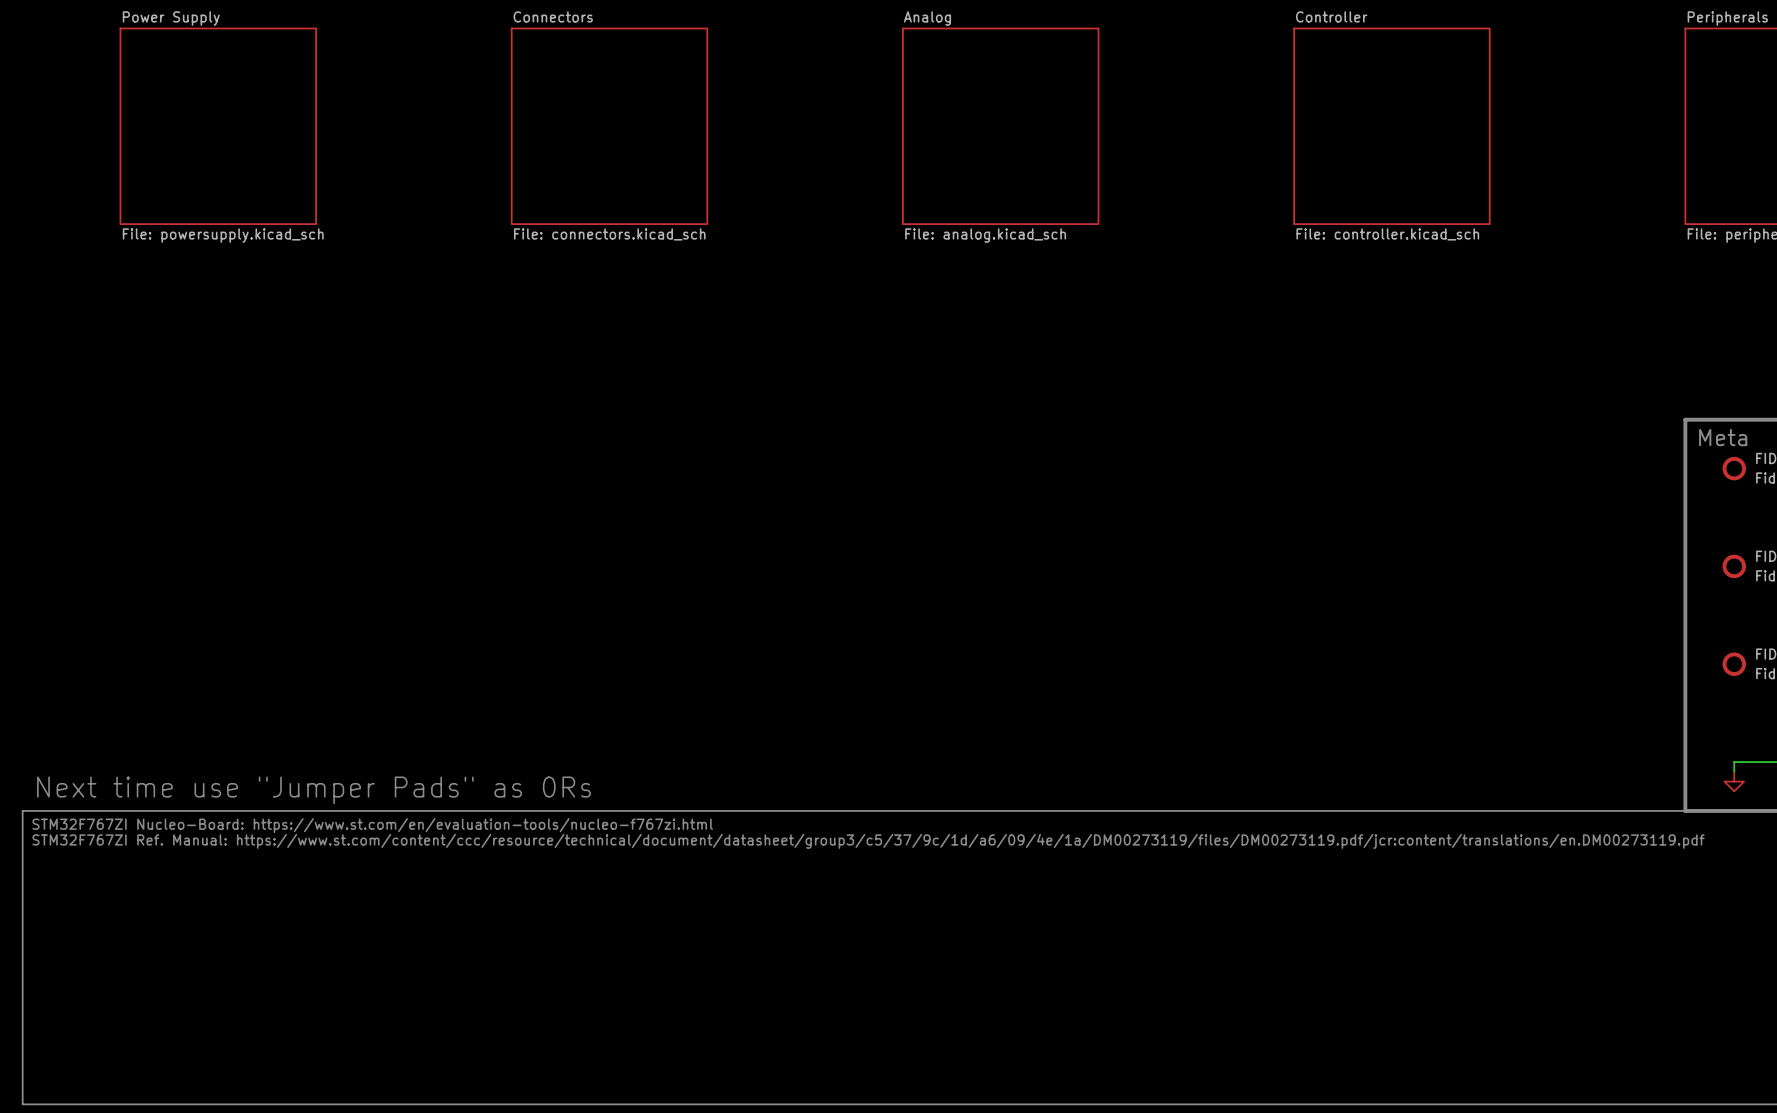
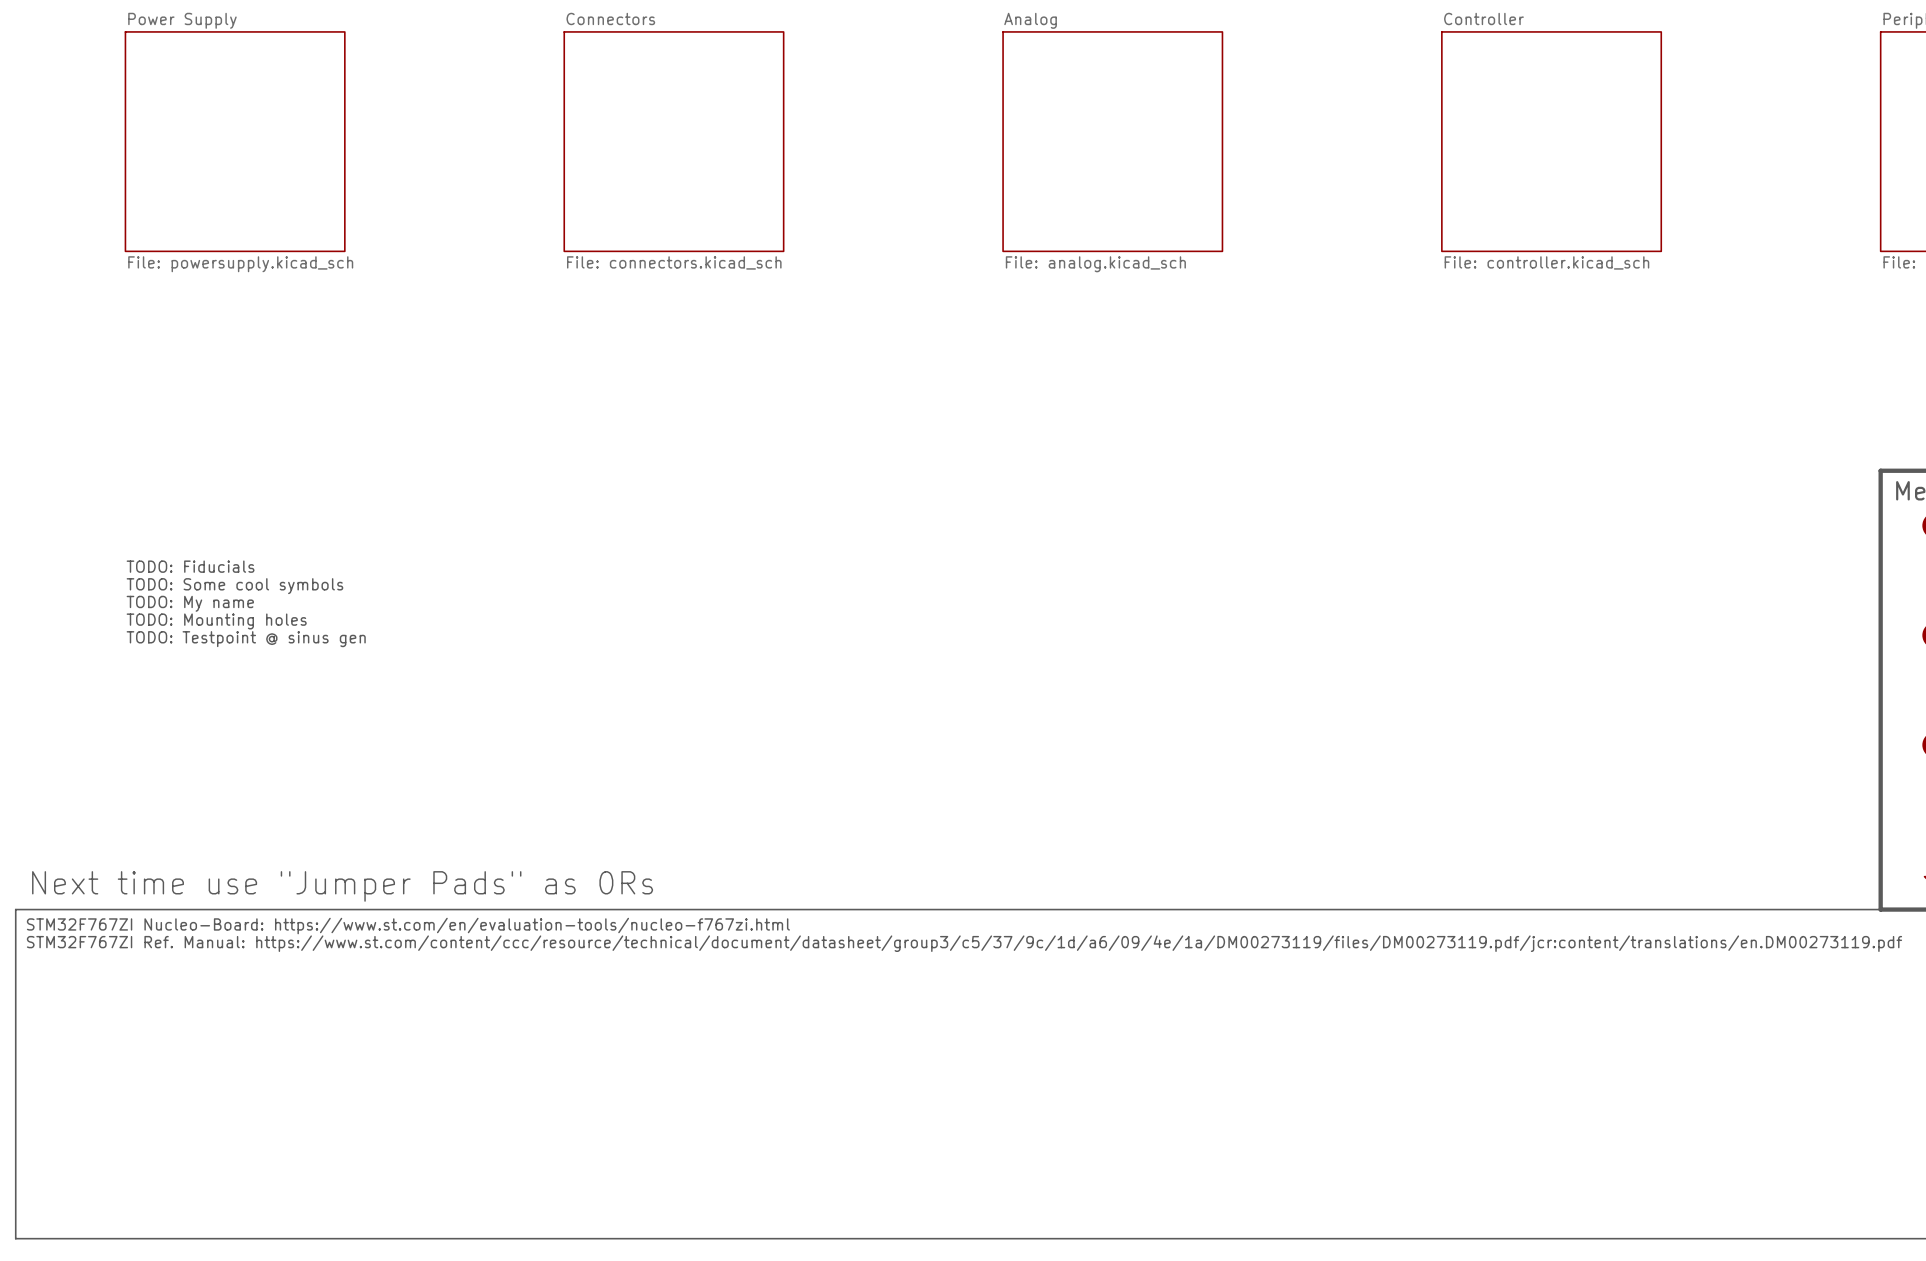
text: none -> TODO: Fiducials (190, 566)
text: none -> TODO: Some cool symbols (234, 586)
text: none -> TODO: My name (190, 603)
text: none -> TODO: Mounting holes (216, 621)
text: none -> TODO: Testpoint @ sinus gen (246, 639)

